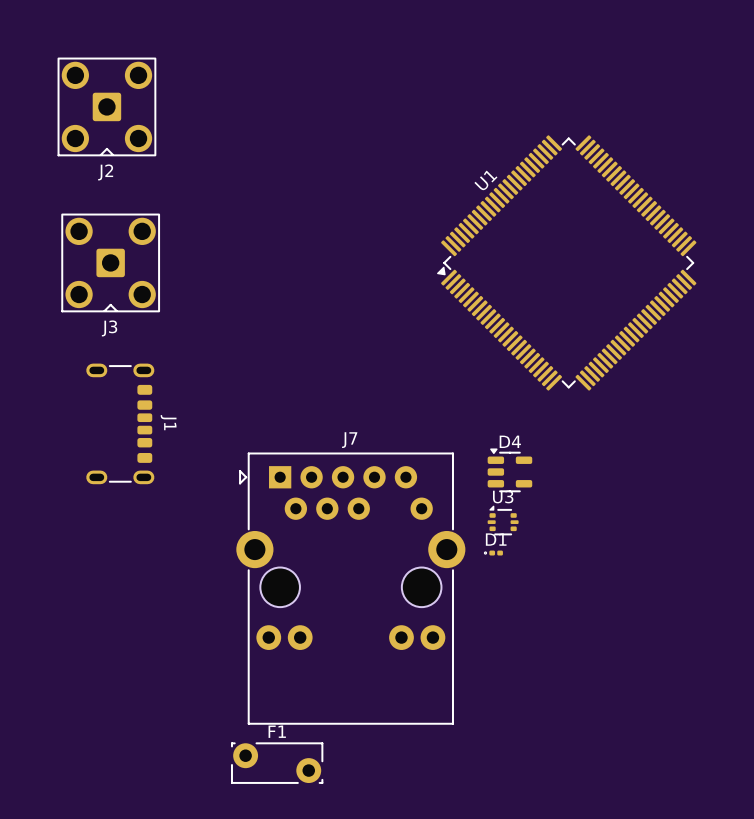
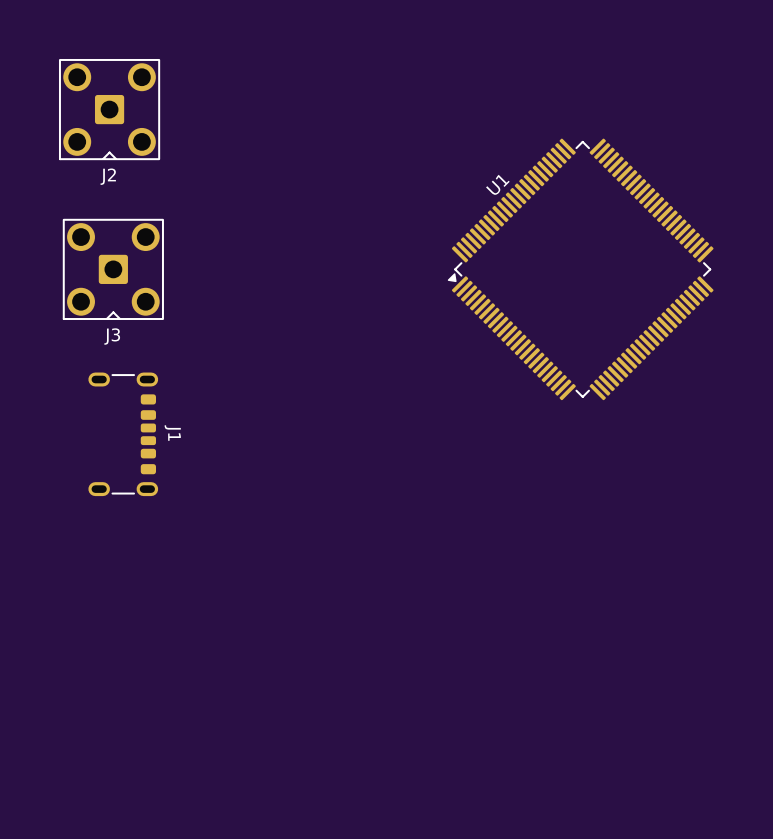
D4: (509, 470) -> none
U3: (503, 520) -> none
D1: (493, 553) -> none
J7: (350, 588) -> none
F1: (277, 763) -> none

